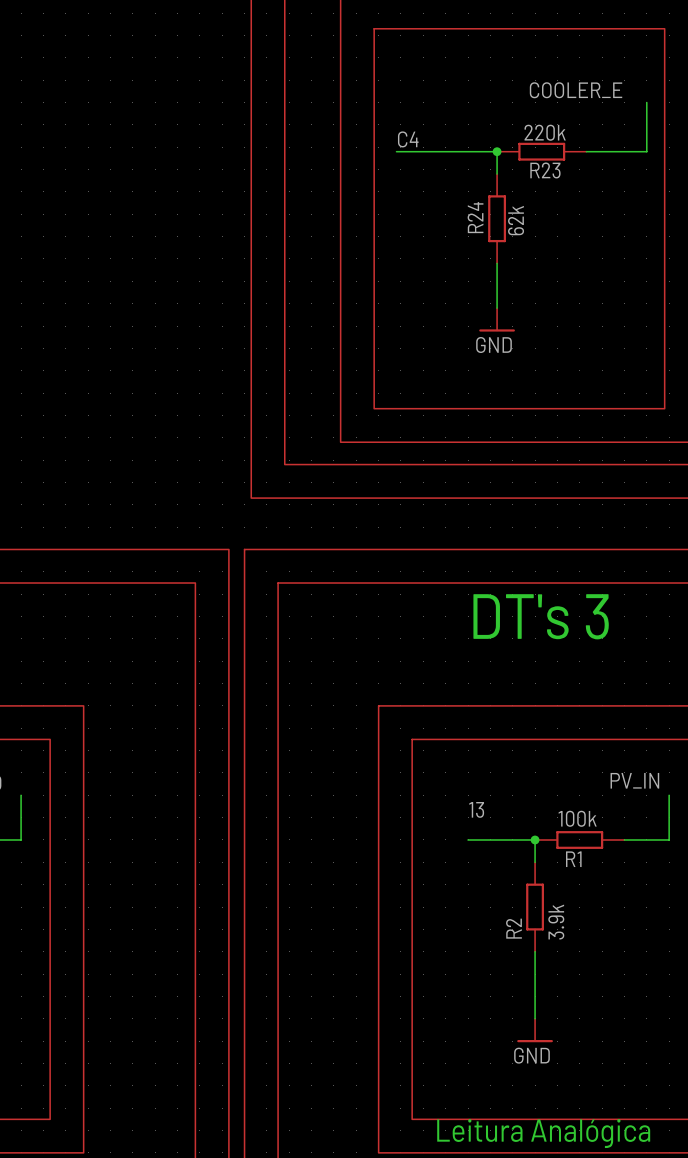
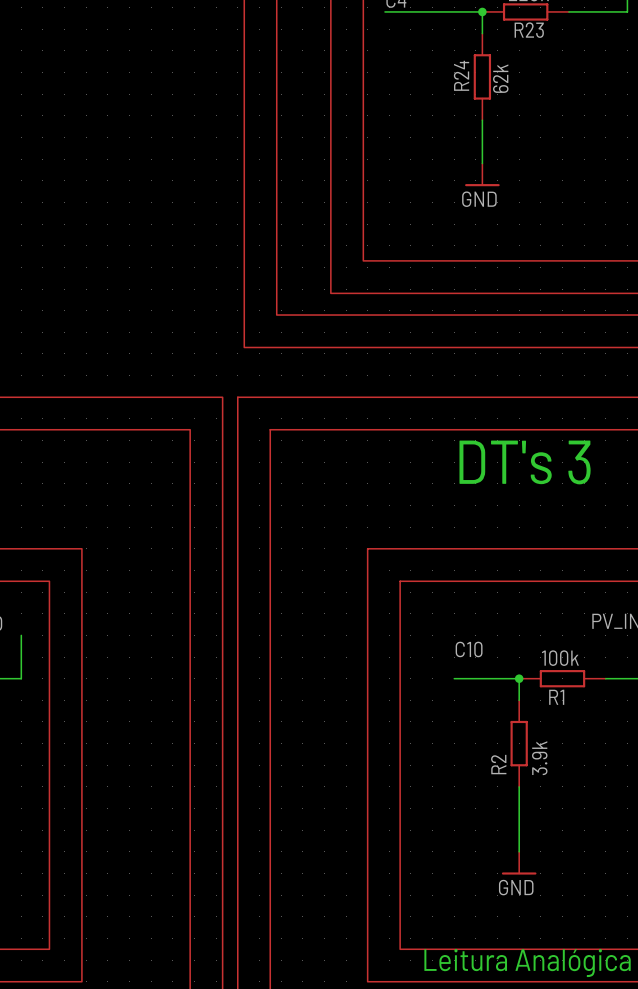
label: 13 (476, 809) -> C10 (469, 649)

